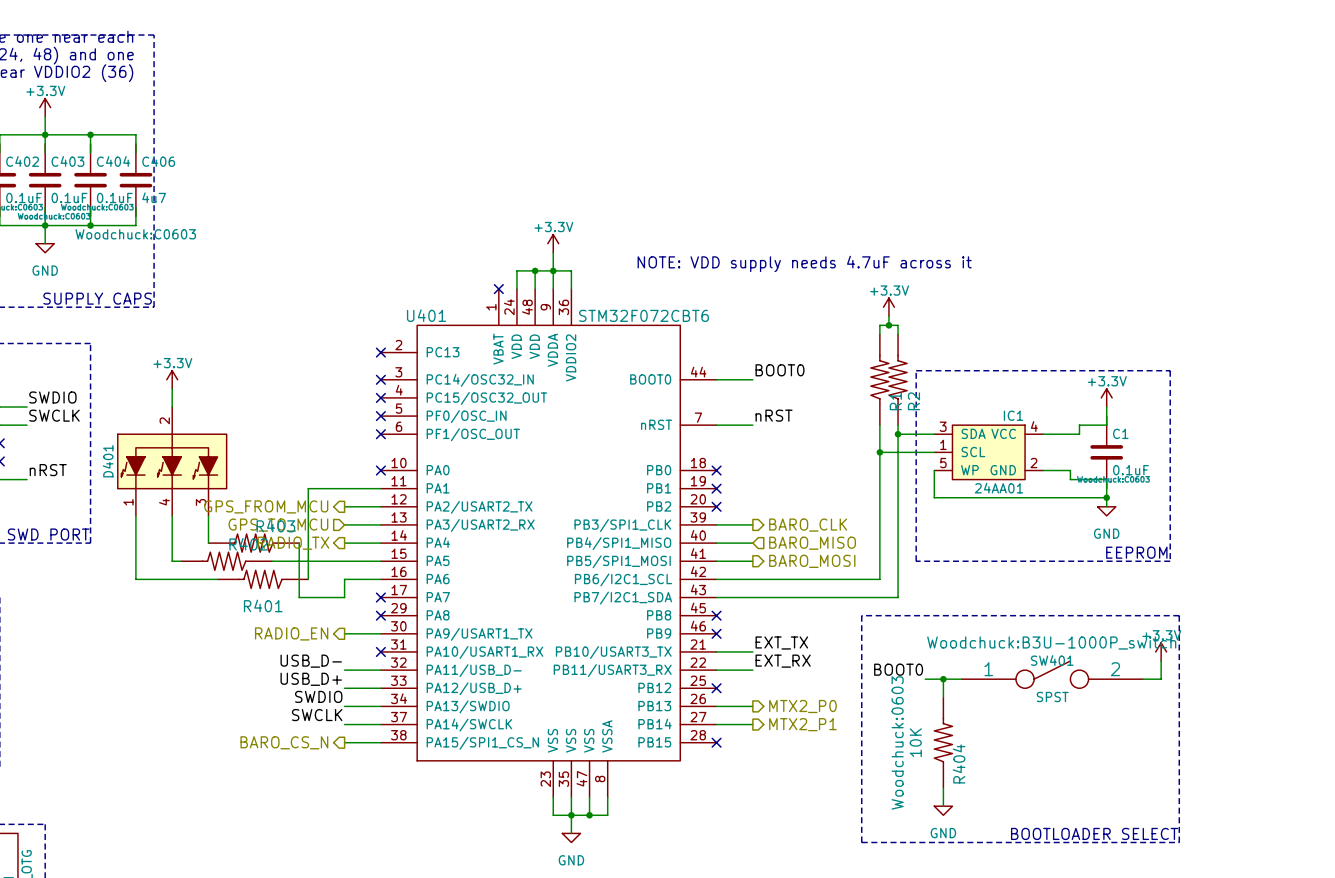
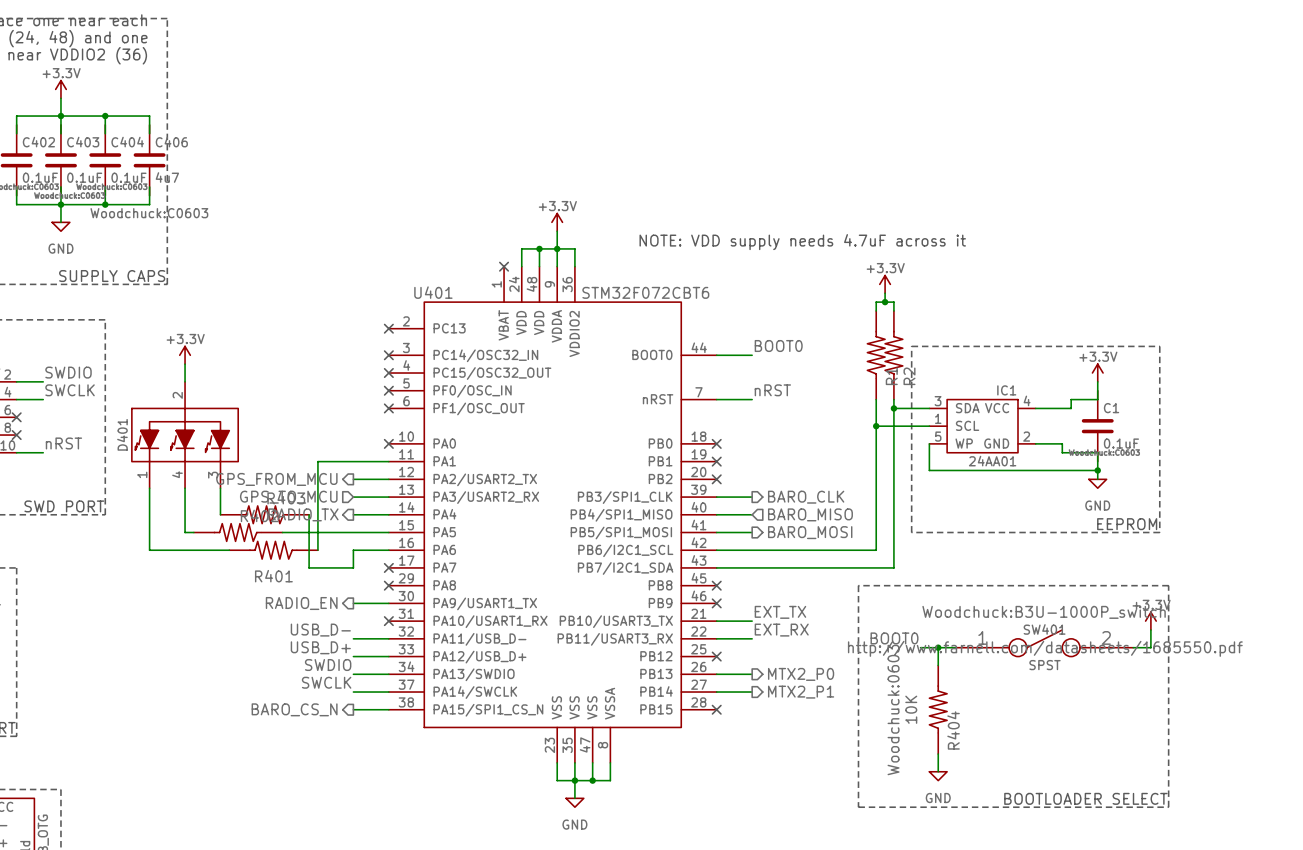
SW401 text: none -> http://www.farnell.com/datasheets/1685550.pdf (1045, 648)

